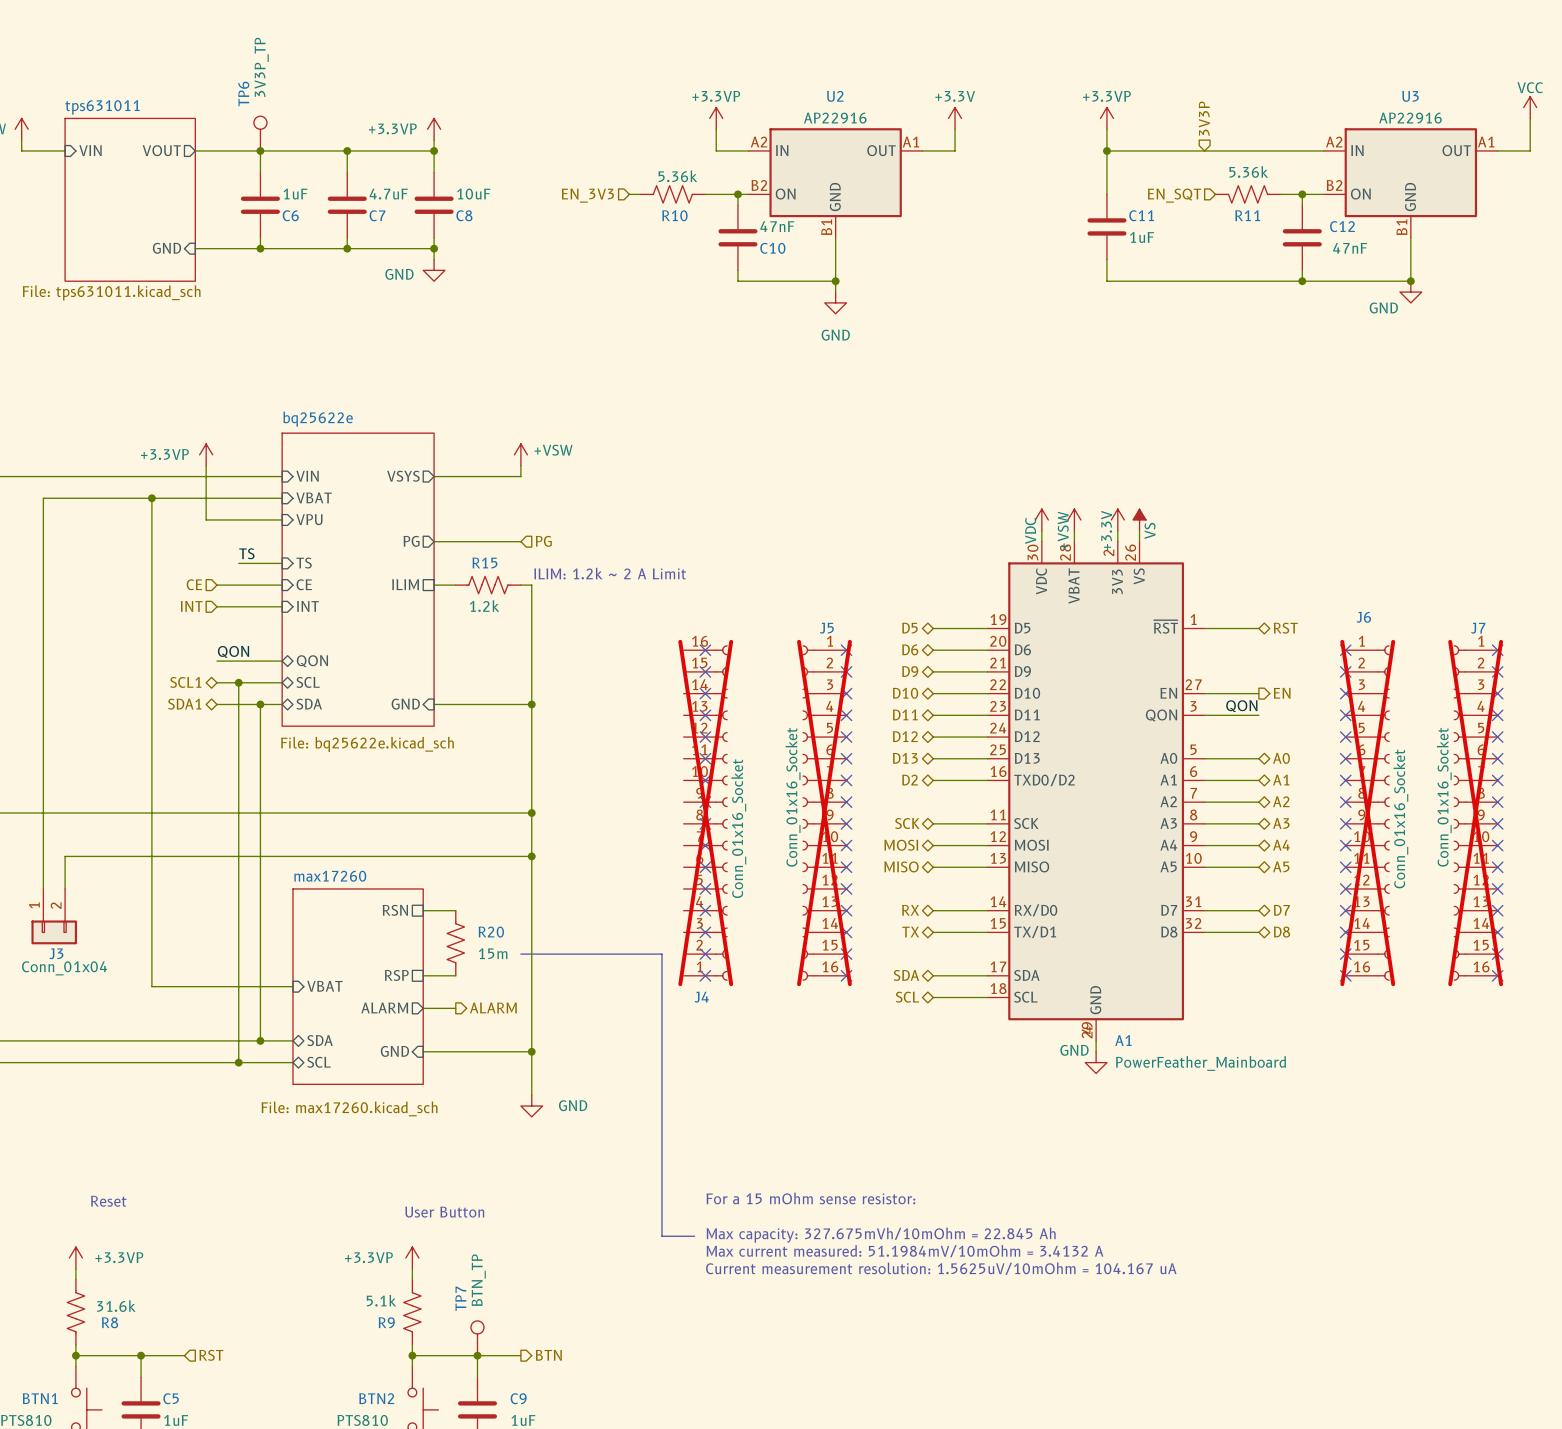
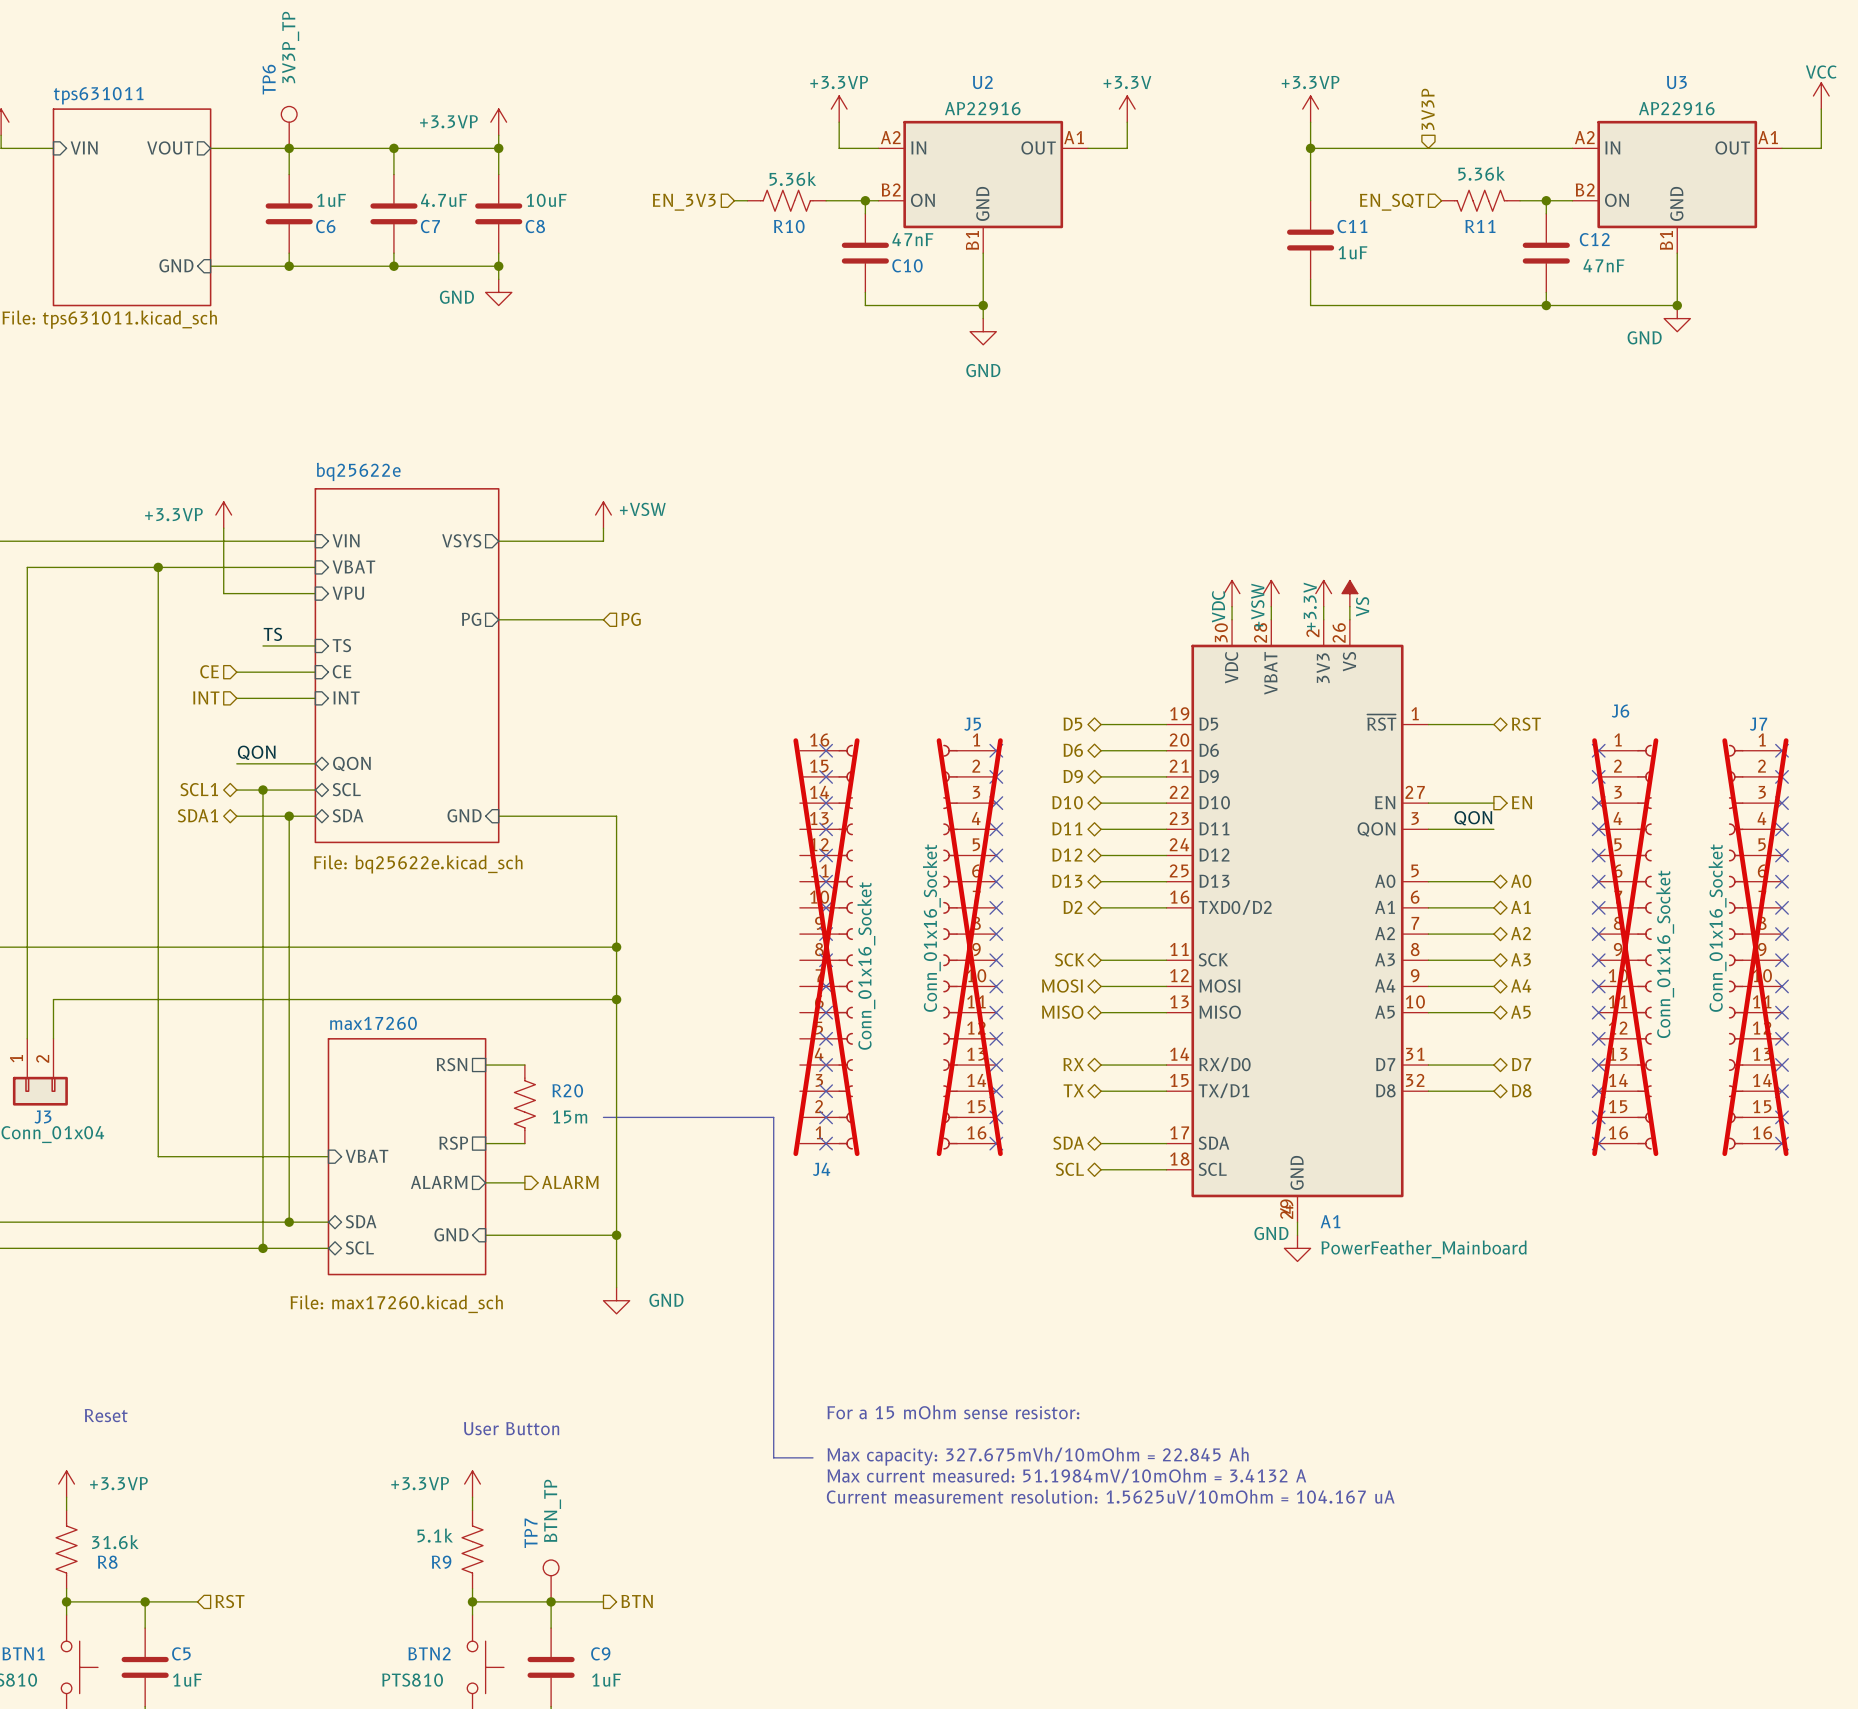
text: ILIM: 1.2k ~ 2 A Limit (610, 573) -> none
sheet pin: ILIM (405, 584) -> none
wire: (434, 585) (455, 585) -> none
R15: 1.2k (488, 585) -> none
wire: (520, 585) (531, 585) (531, 704) -> none
junction: (531, 704) -> none

